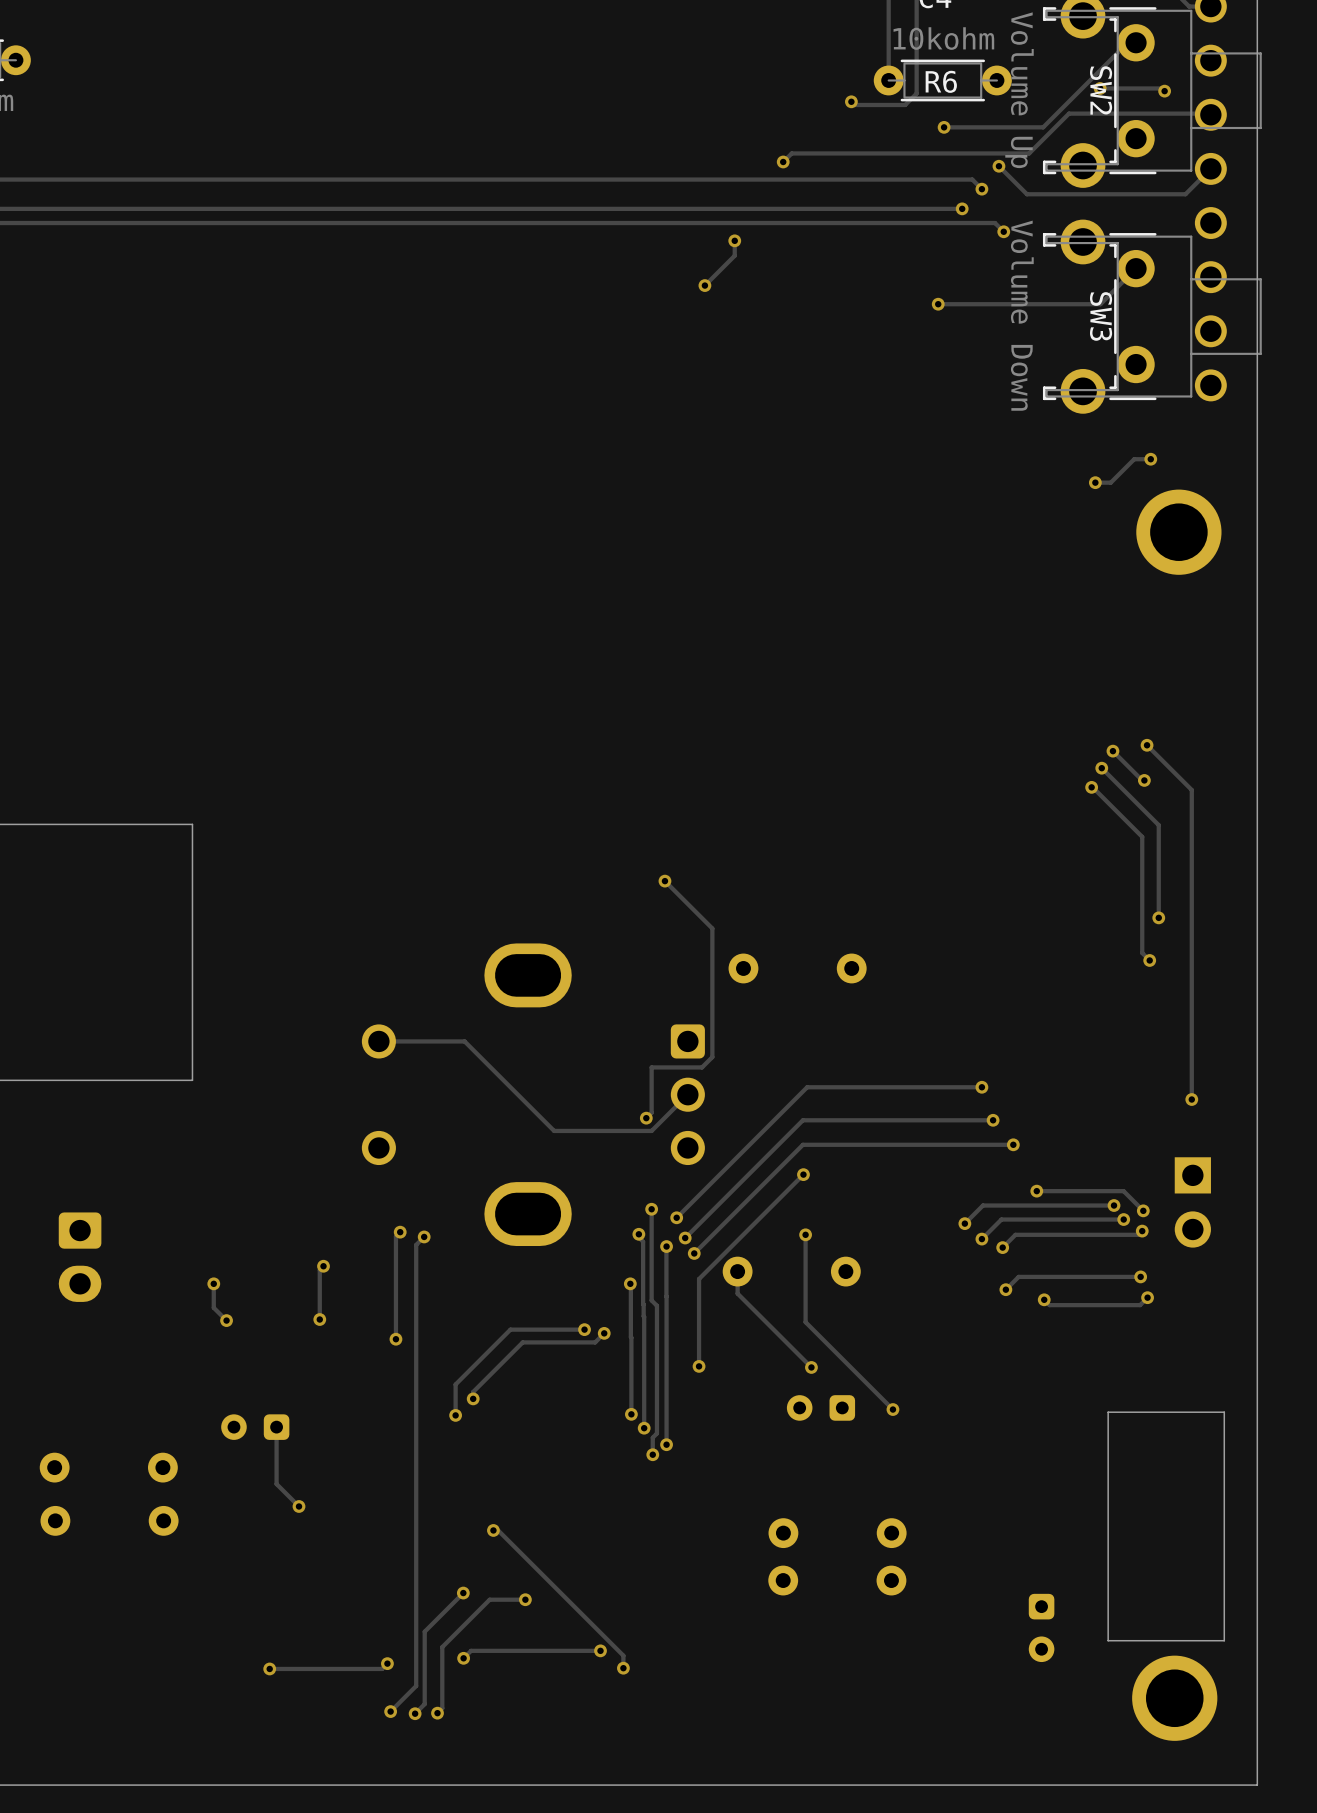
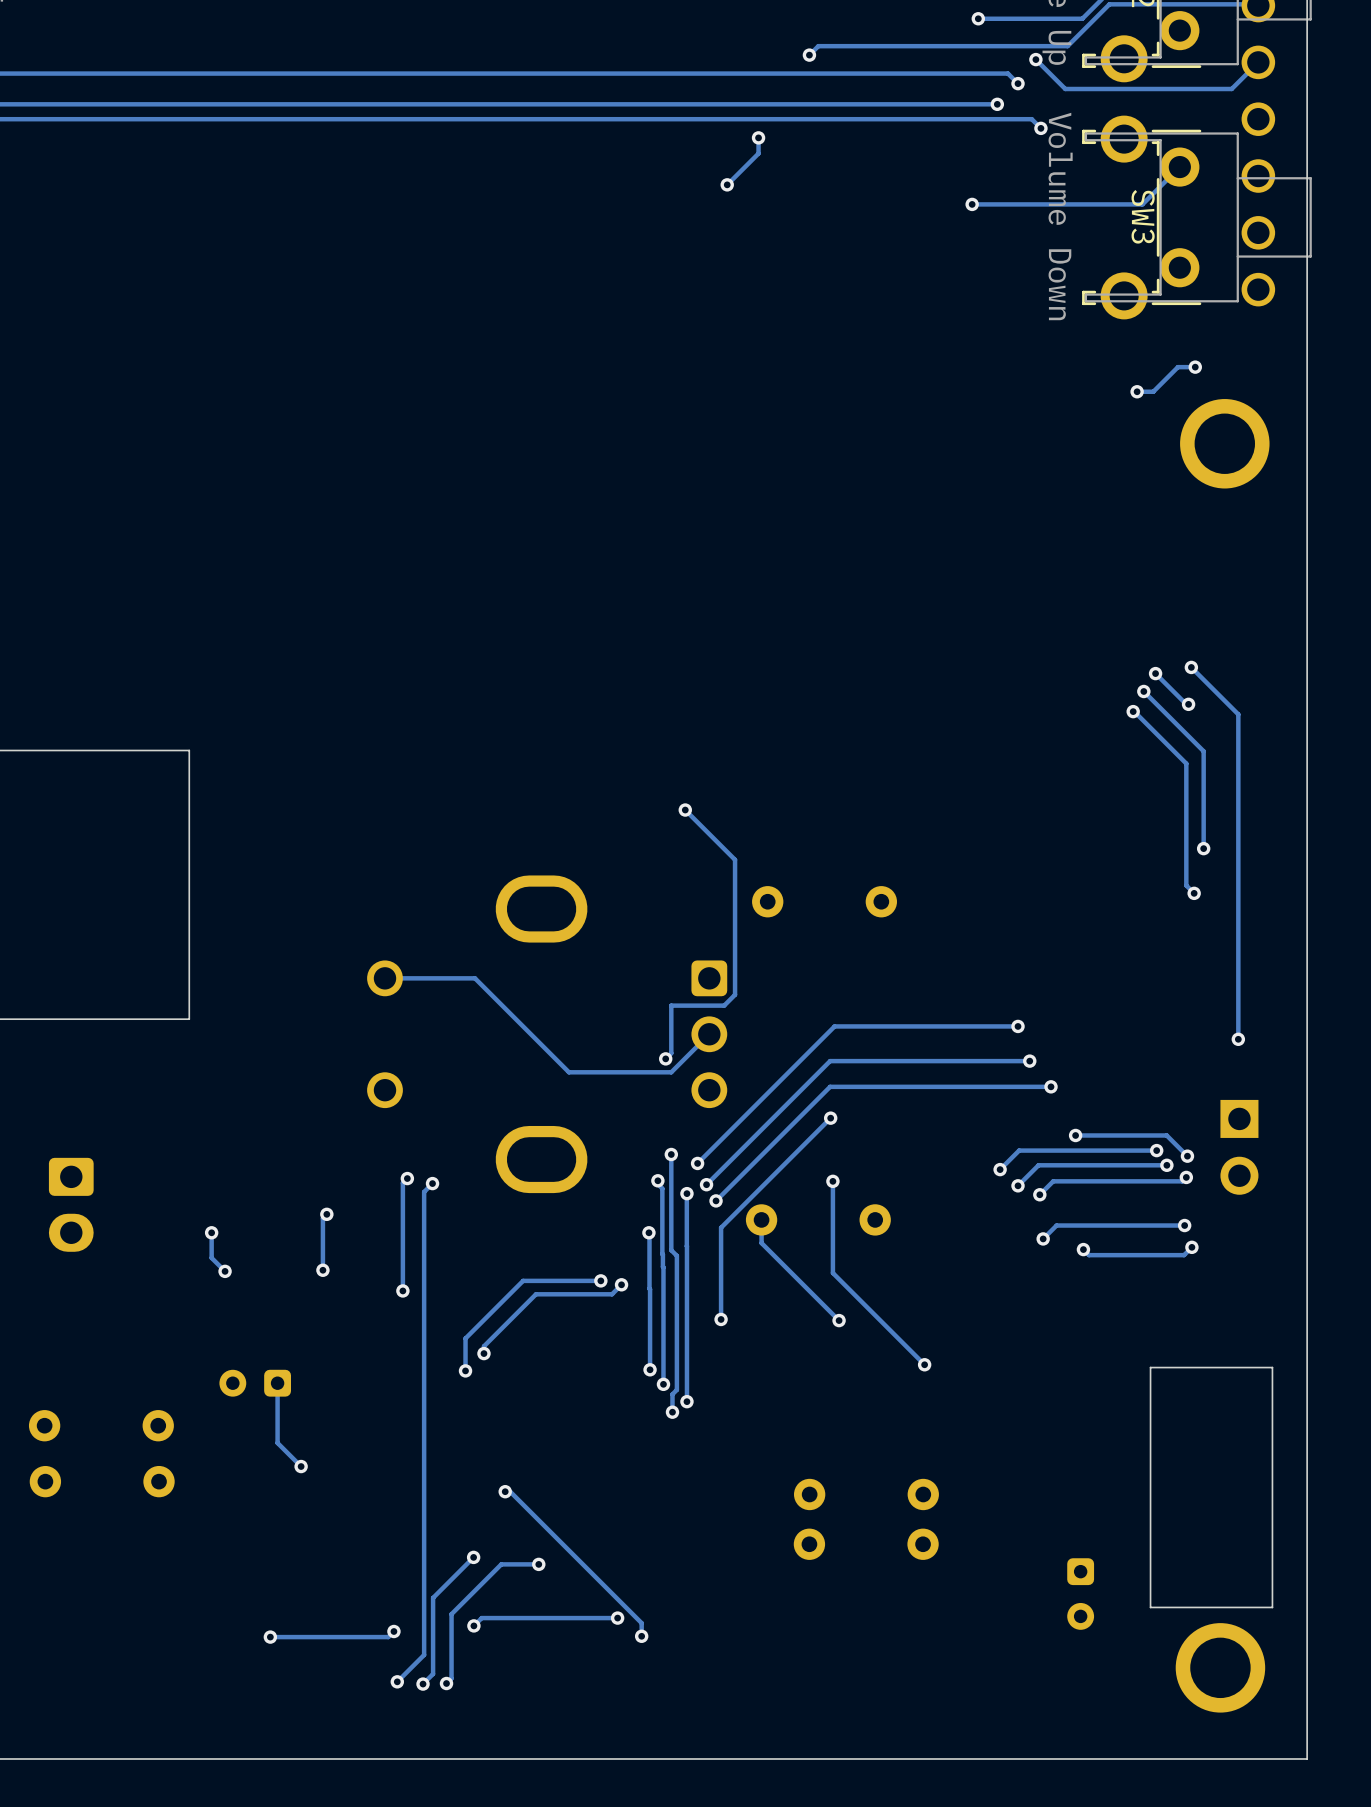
part: (820, 1407) -> none

